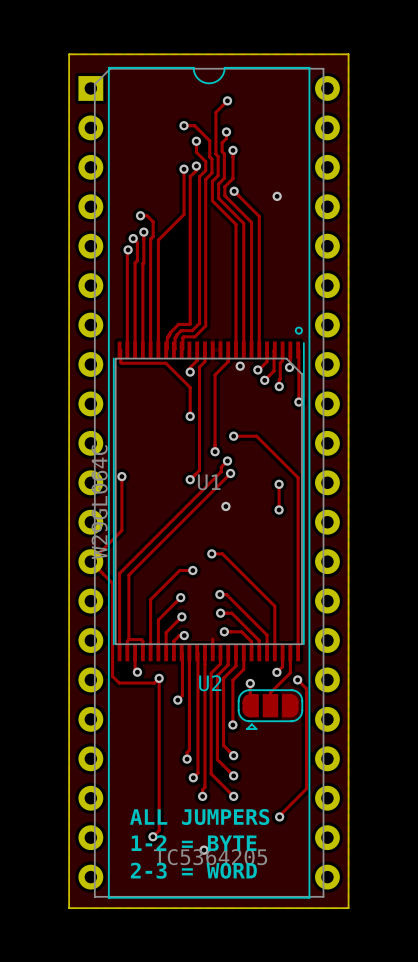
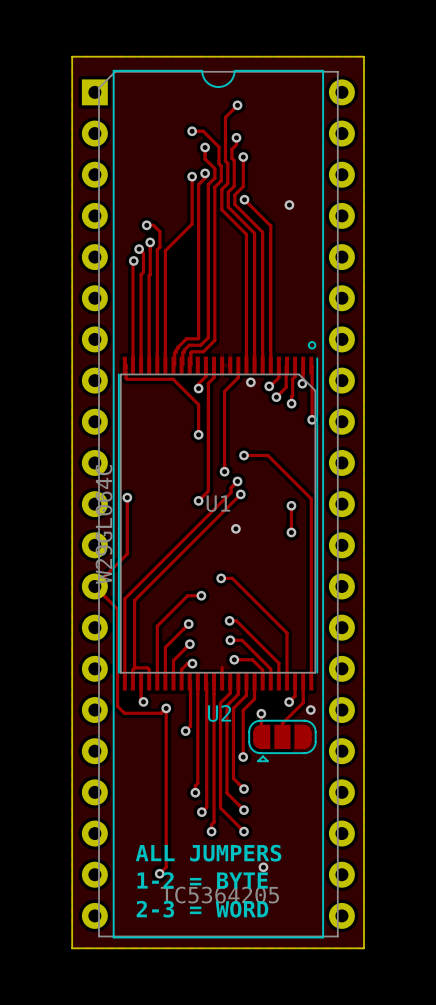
track: (297, 679) (306, 688) (306, 788) (279, 816) -> none
via: (279, 816) -> none
via: none -> (263, 867)
via: (204, 850) -> none

